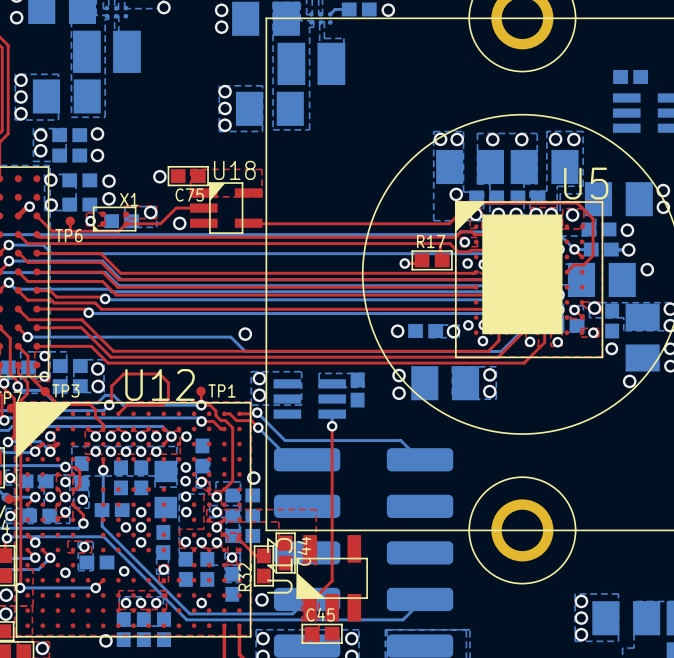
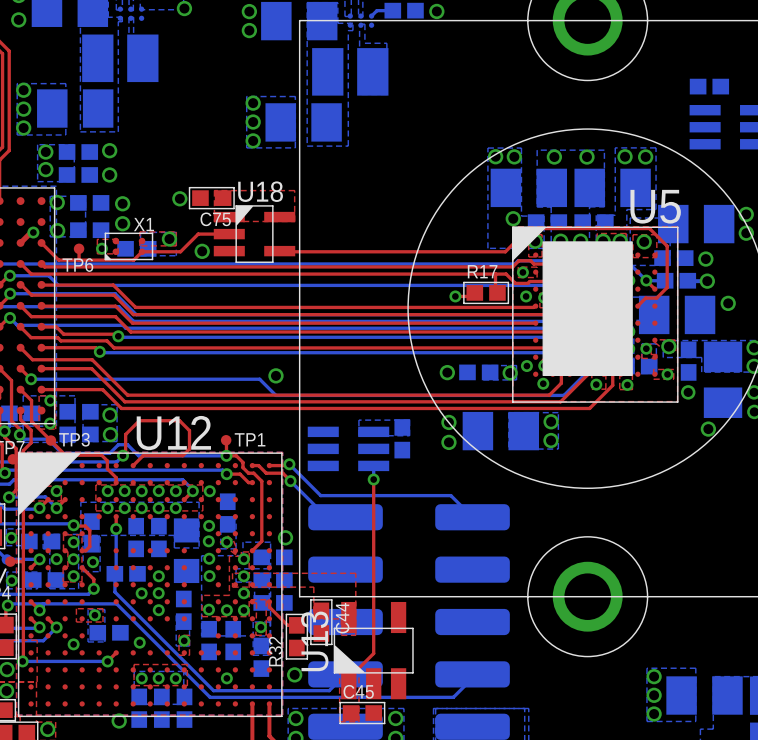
via: (259, 378) -> none
via: (259, 395) -> none
bottom zone outline: (251, 402) (251, 371) (301, 371) (301, 405) (251, 405) -> none

